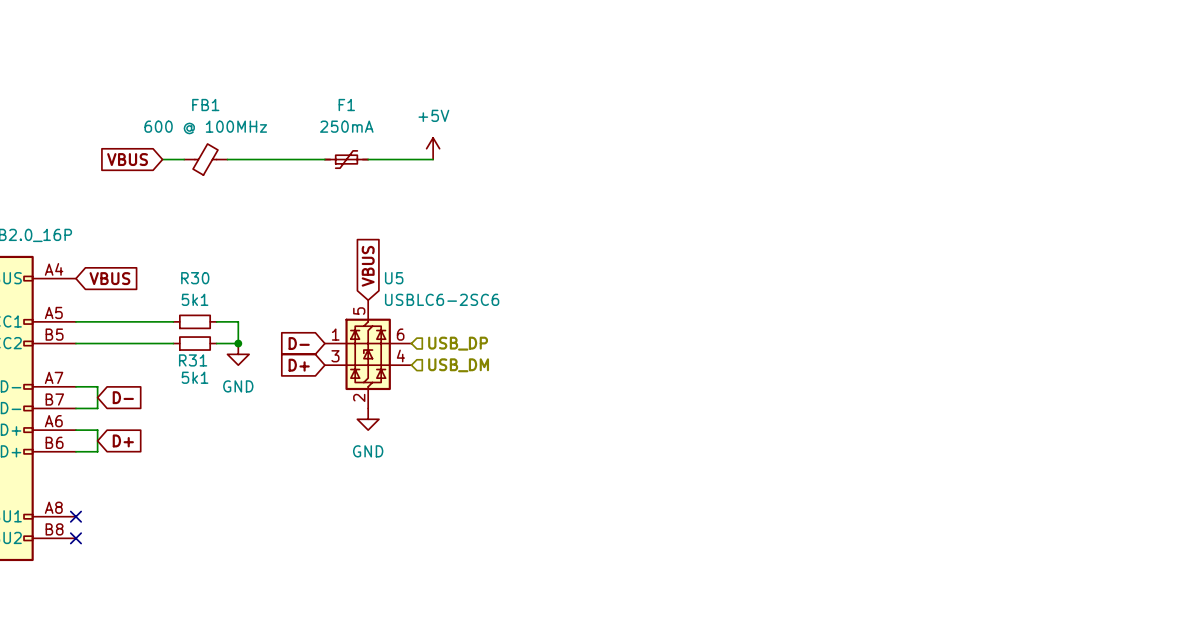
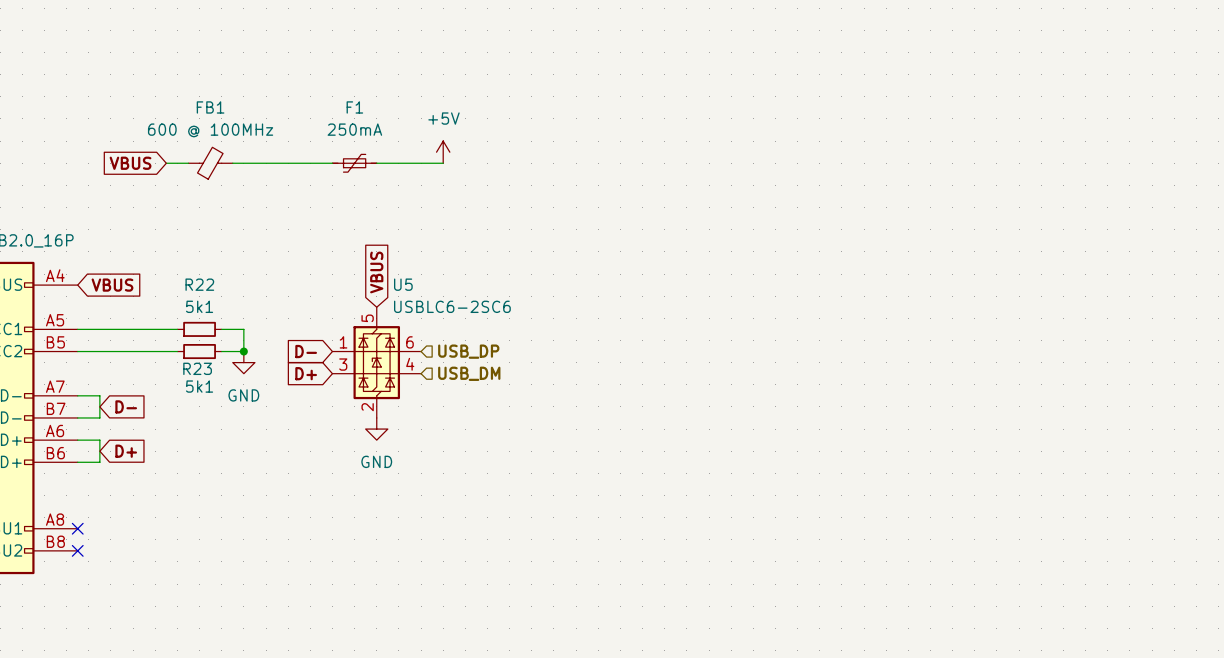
R30 name: R30 (195, 278) -> R22 (199, 284)
R31 name: R31 (193, 360) -> R23 (197, 368)

